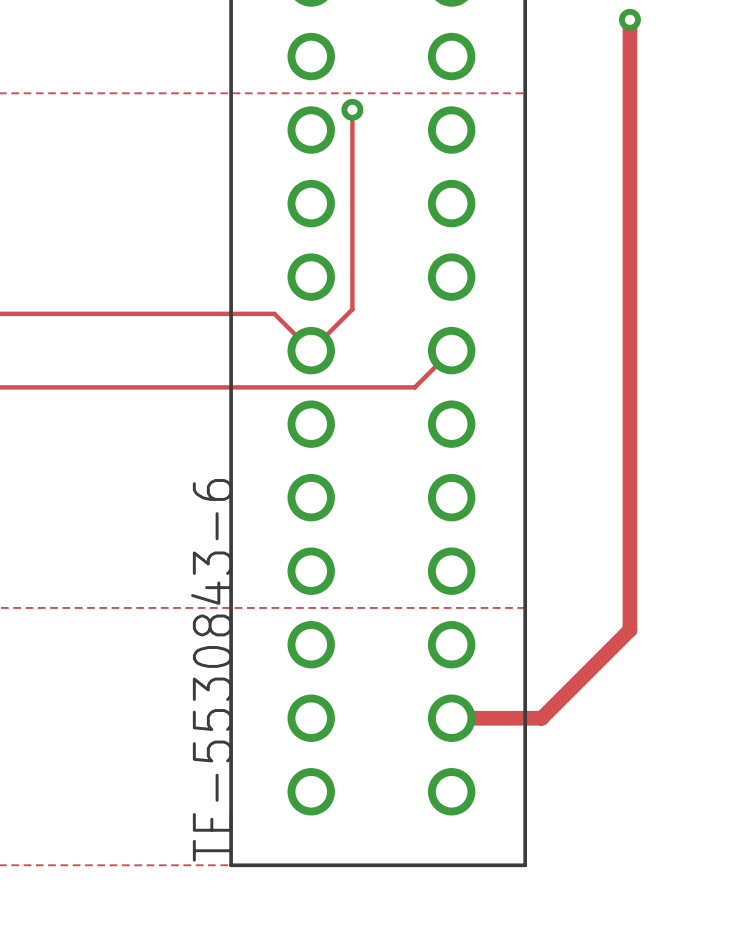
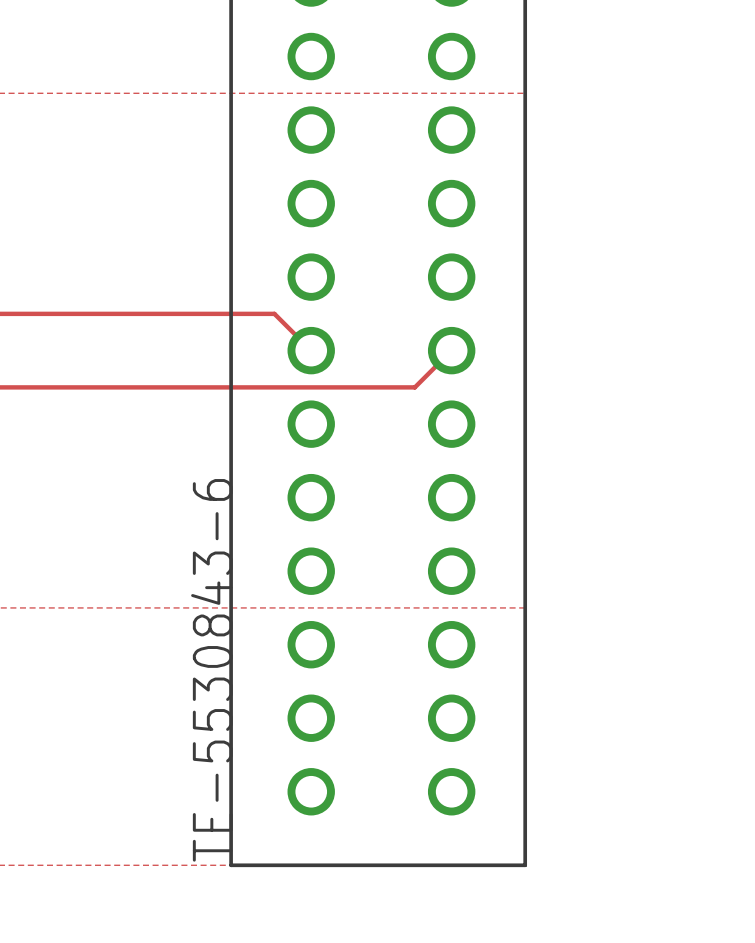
track: (629, 19) (629, 630) (541, 718) (451, 718) -> none
via: (629, 19) -> none
track: (352, 109) (352, 309) (311, 350) -> none
via: (352, 109) -> none

